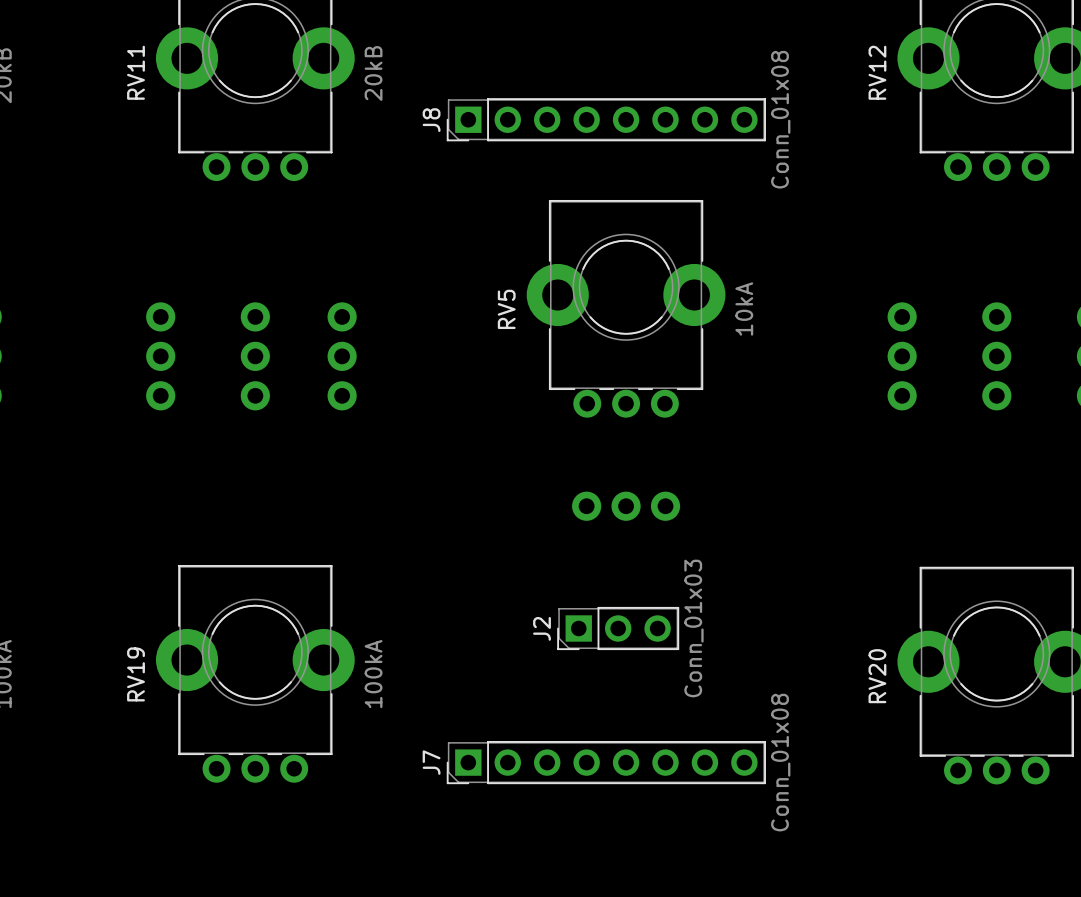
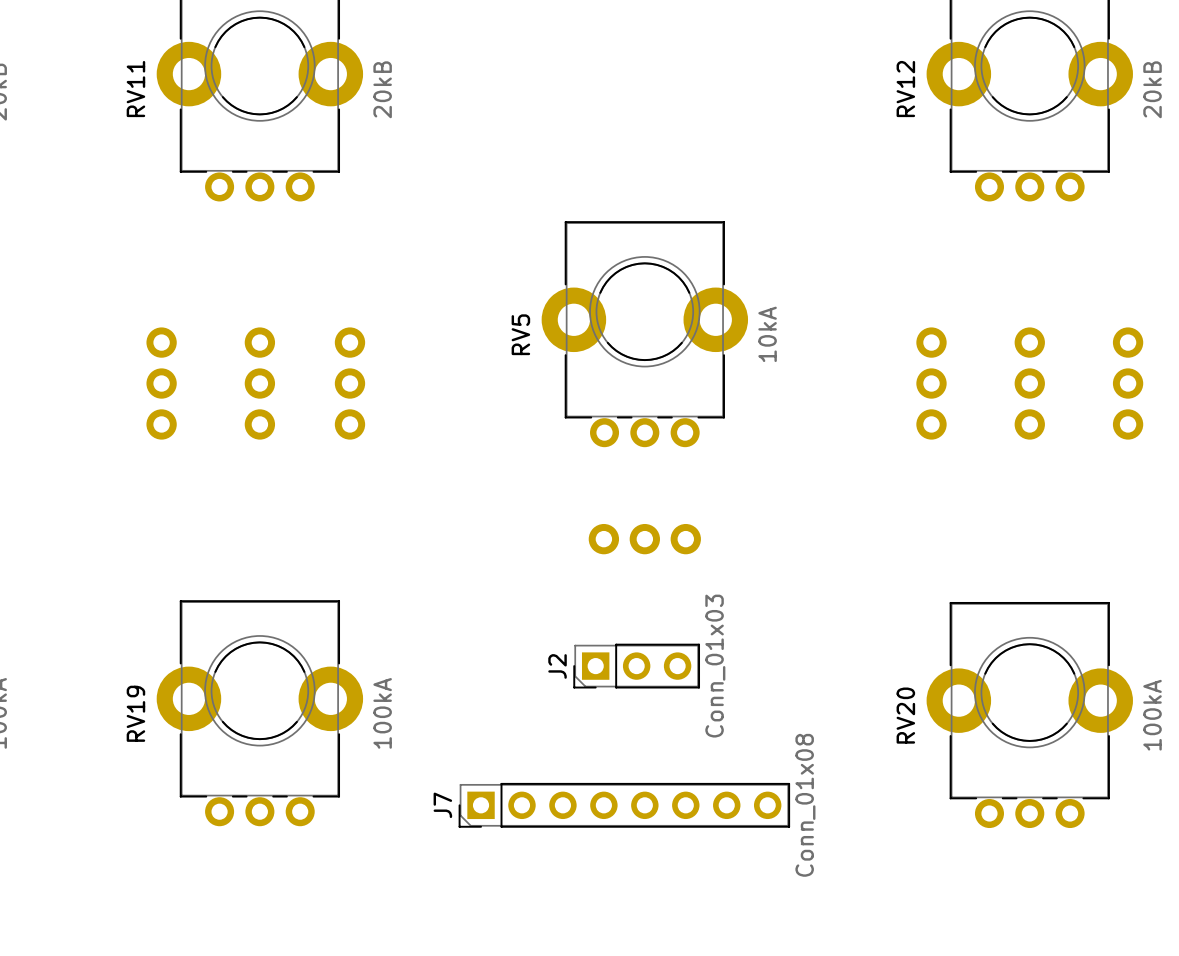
J8: Conn_01x08 (606, 119) -> none

